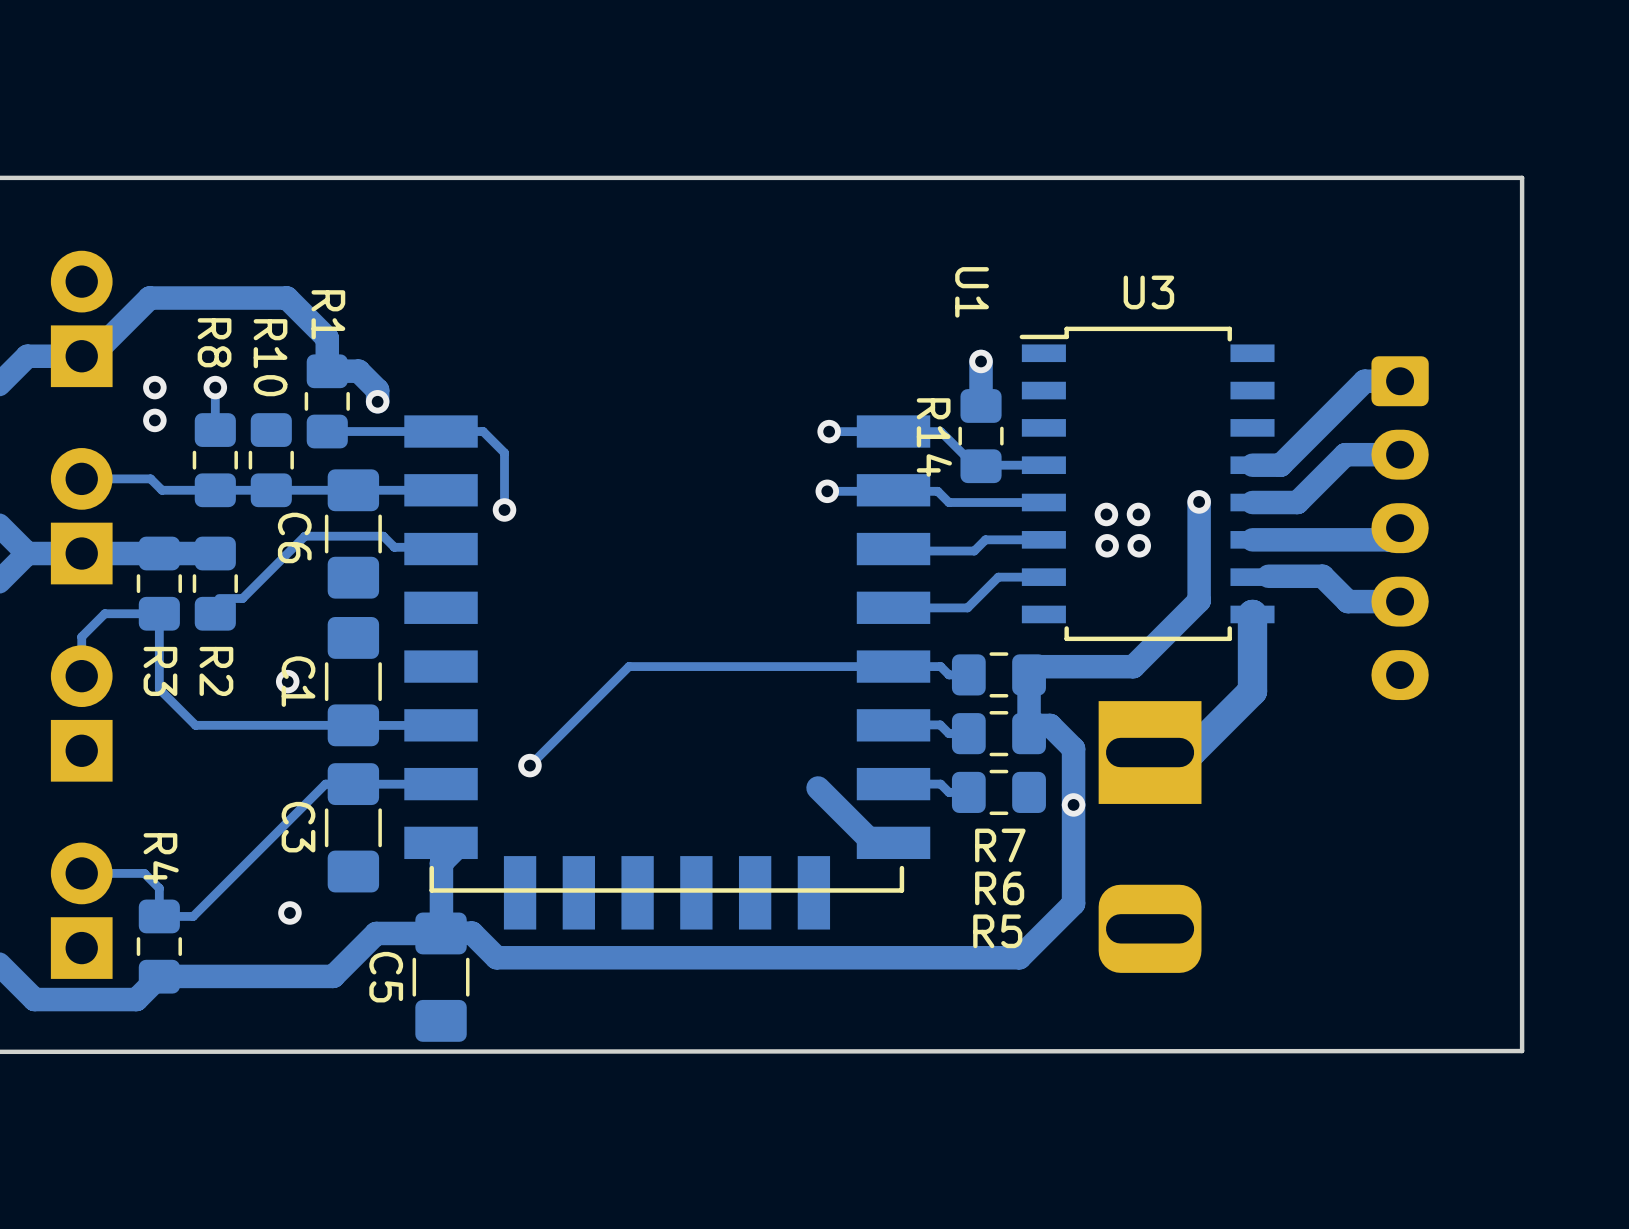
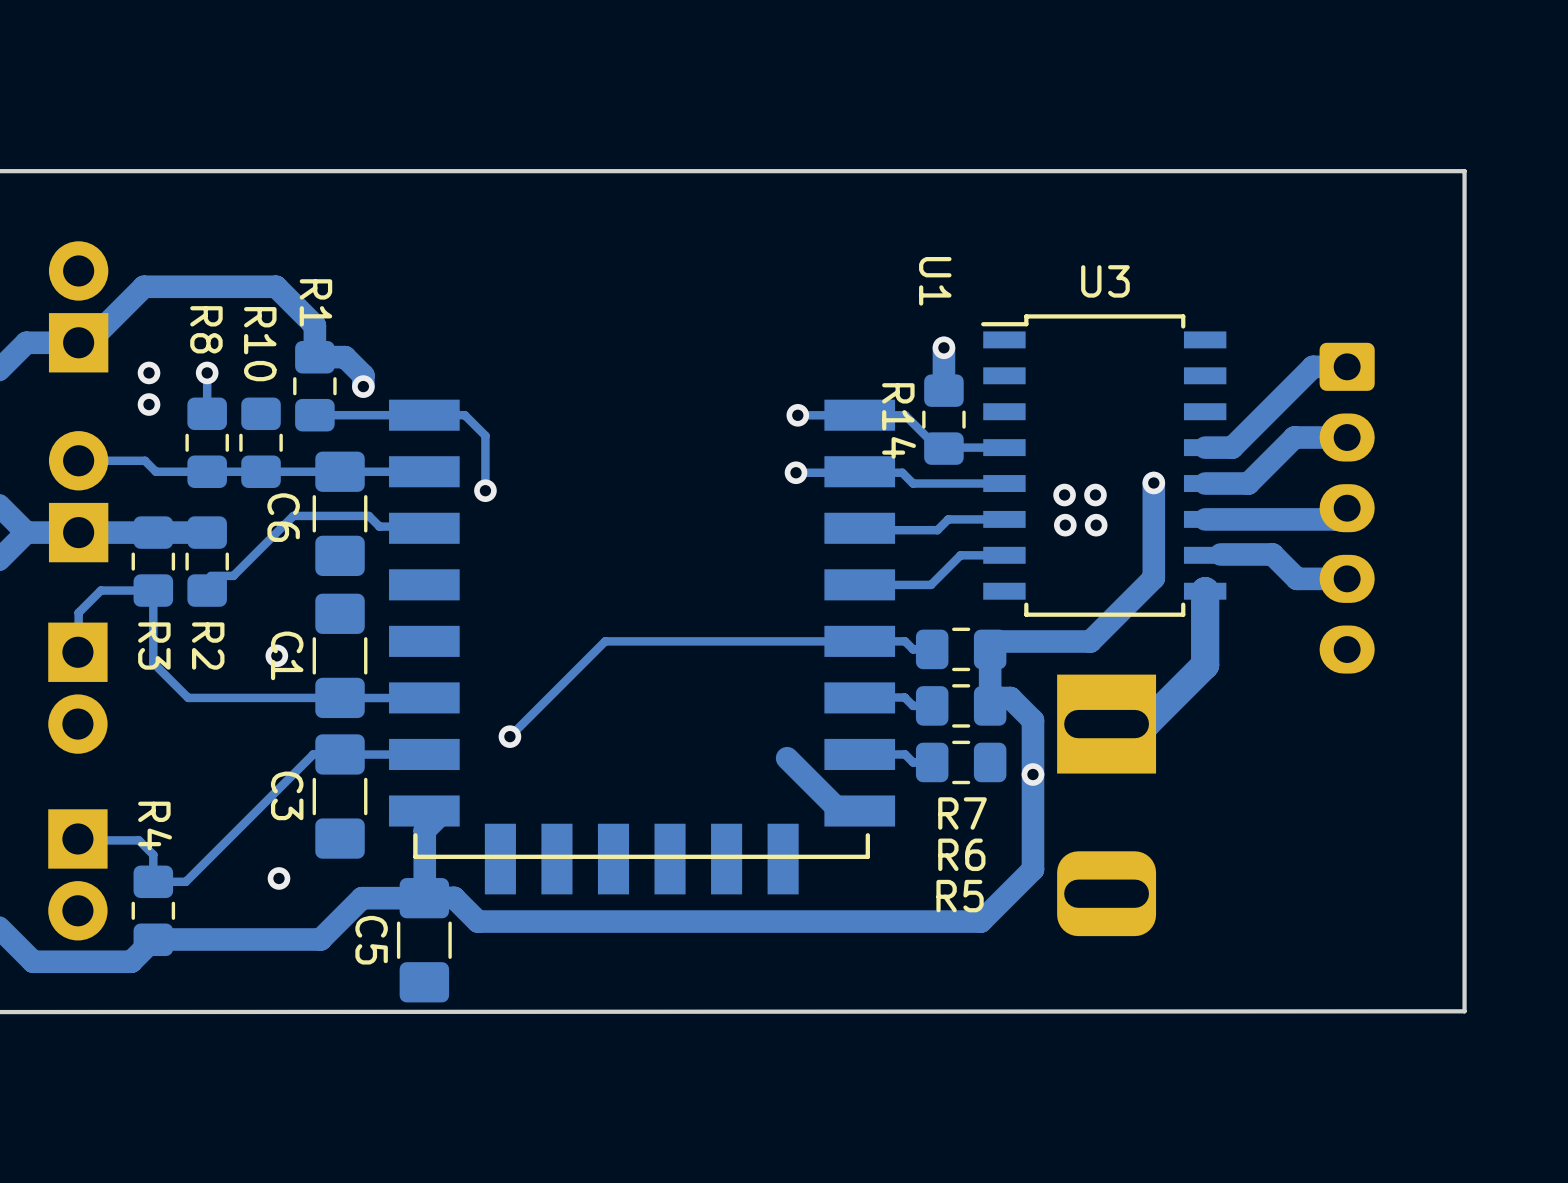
part rotation: 0° (81, 713) -> 180° (77, 688)
part rotation: 0° (81, 910) -> 180° (77, 874)

